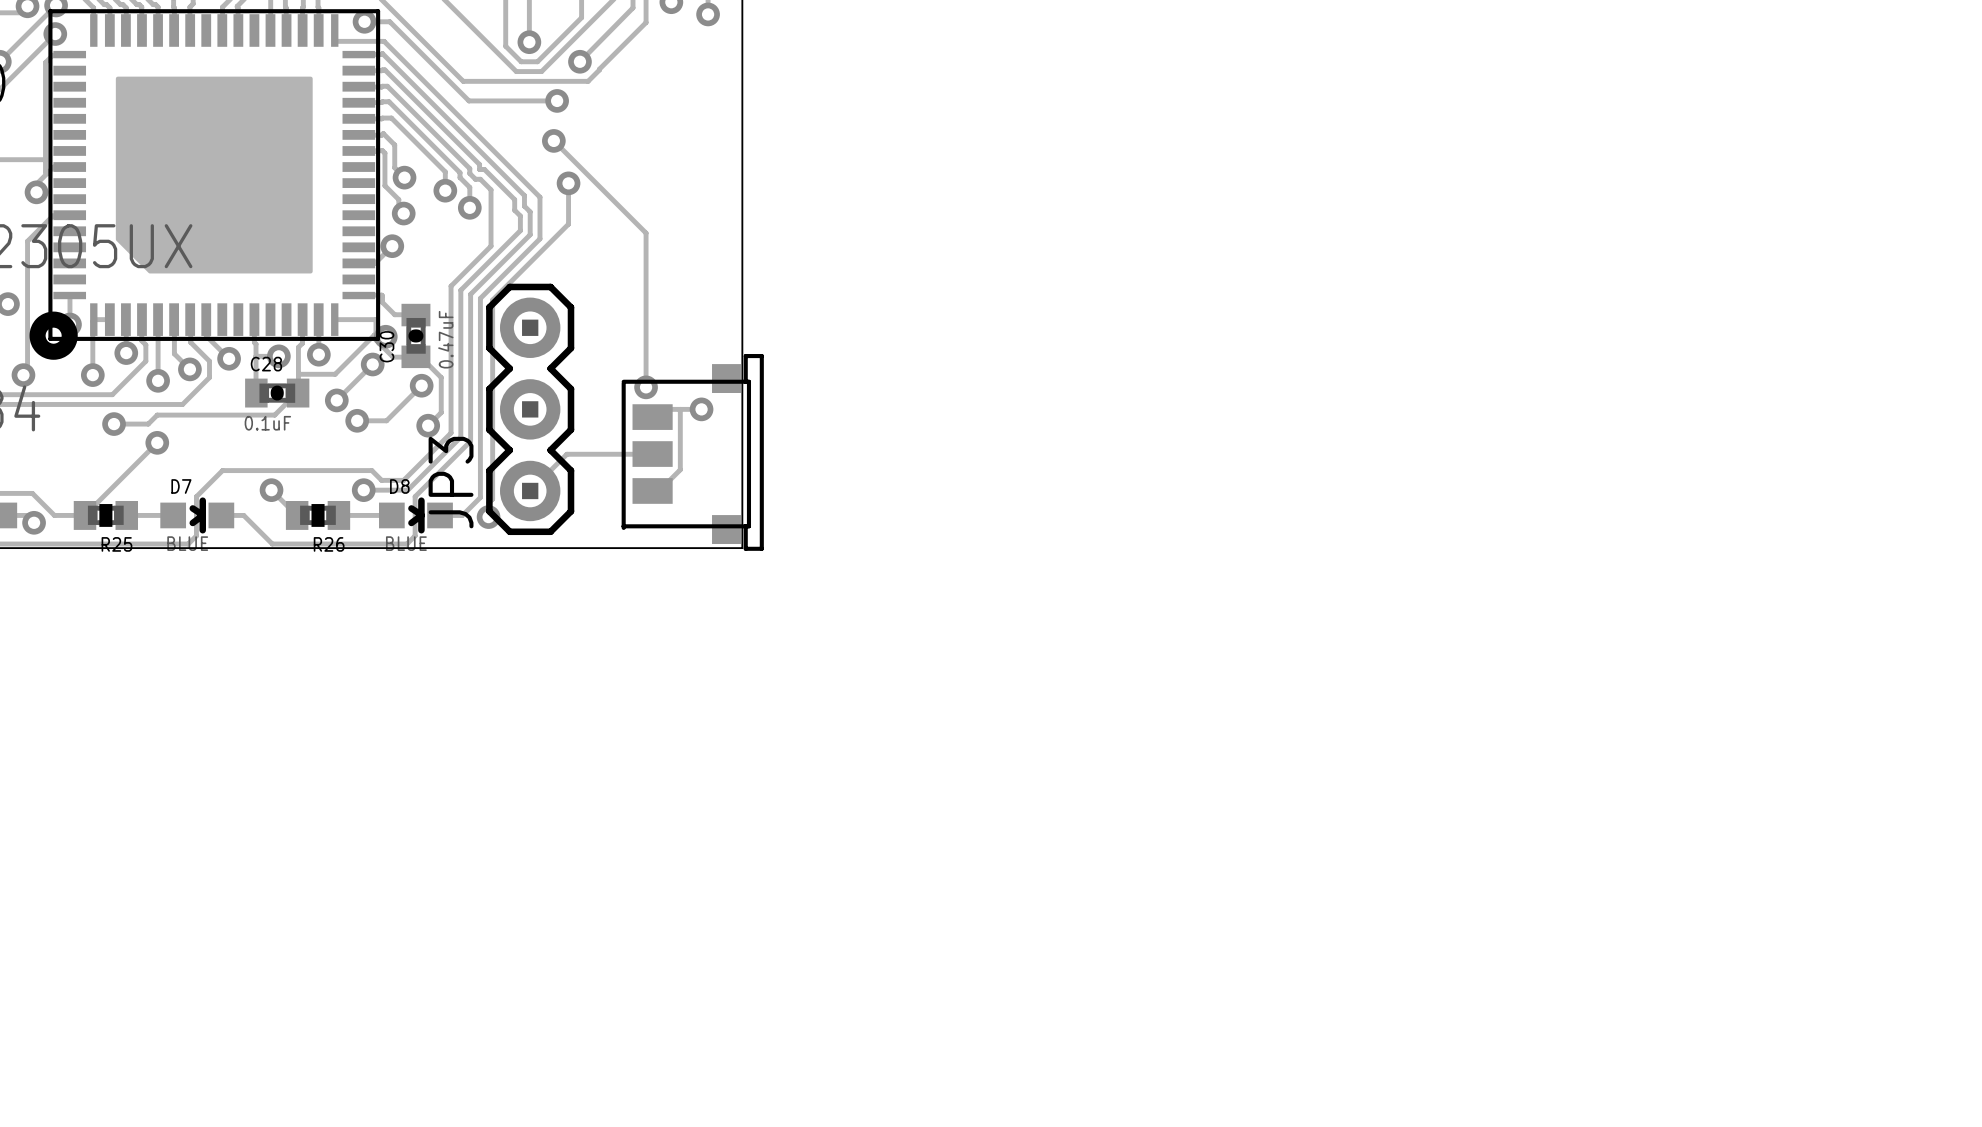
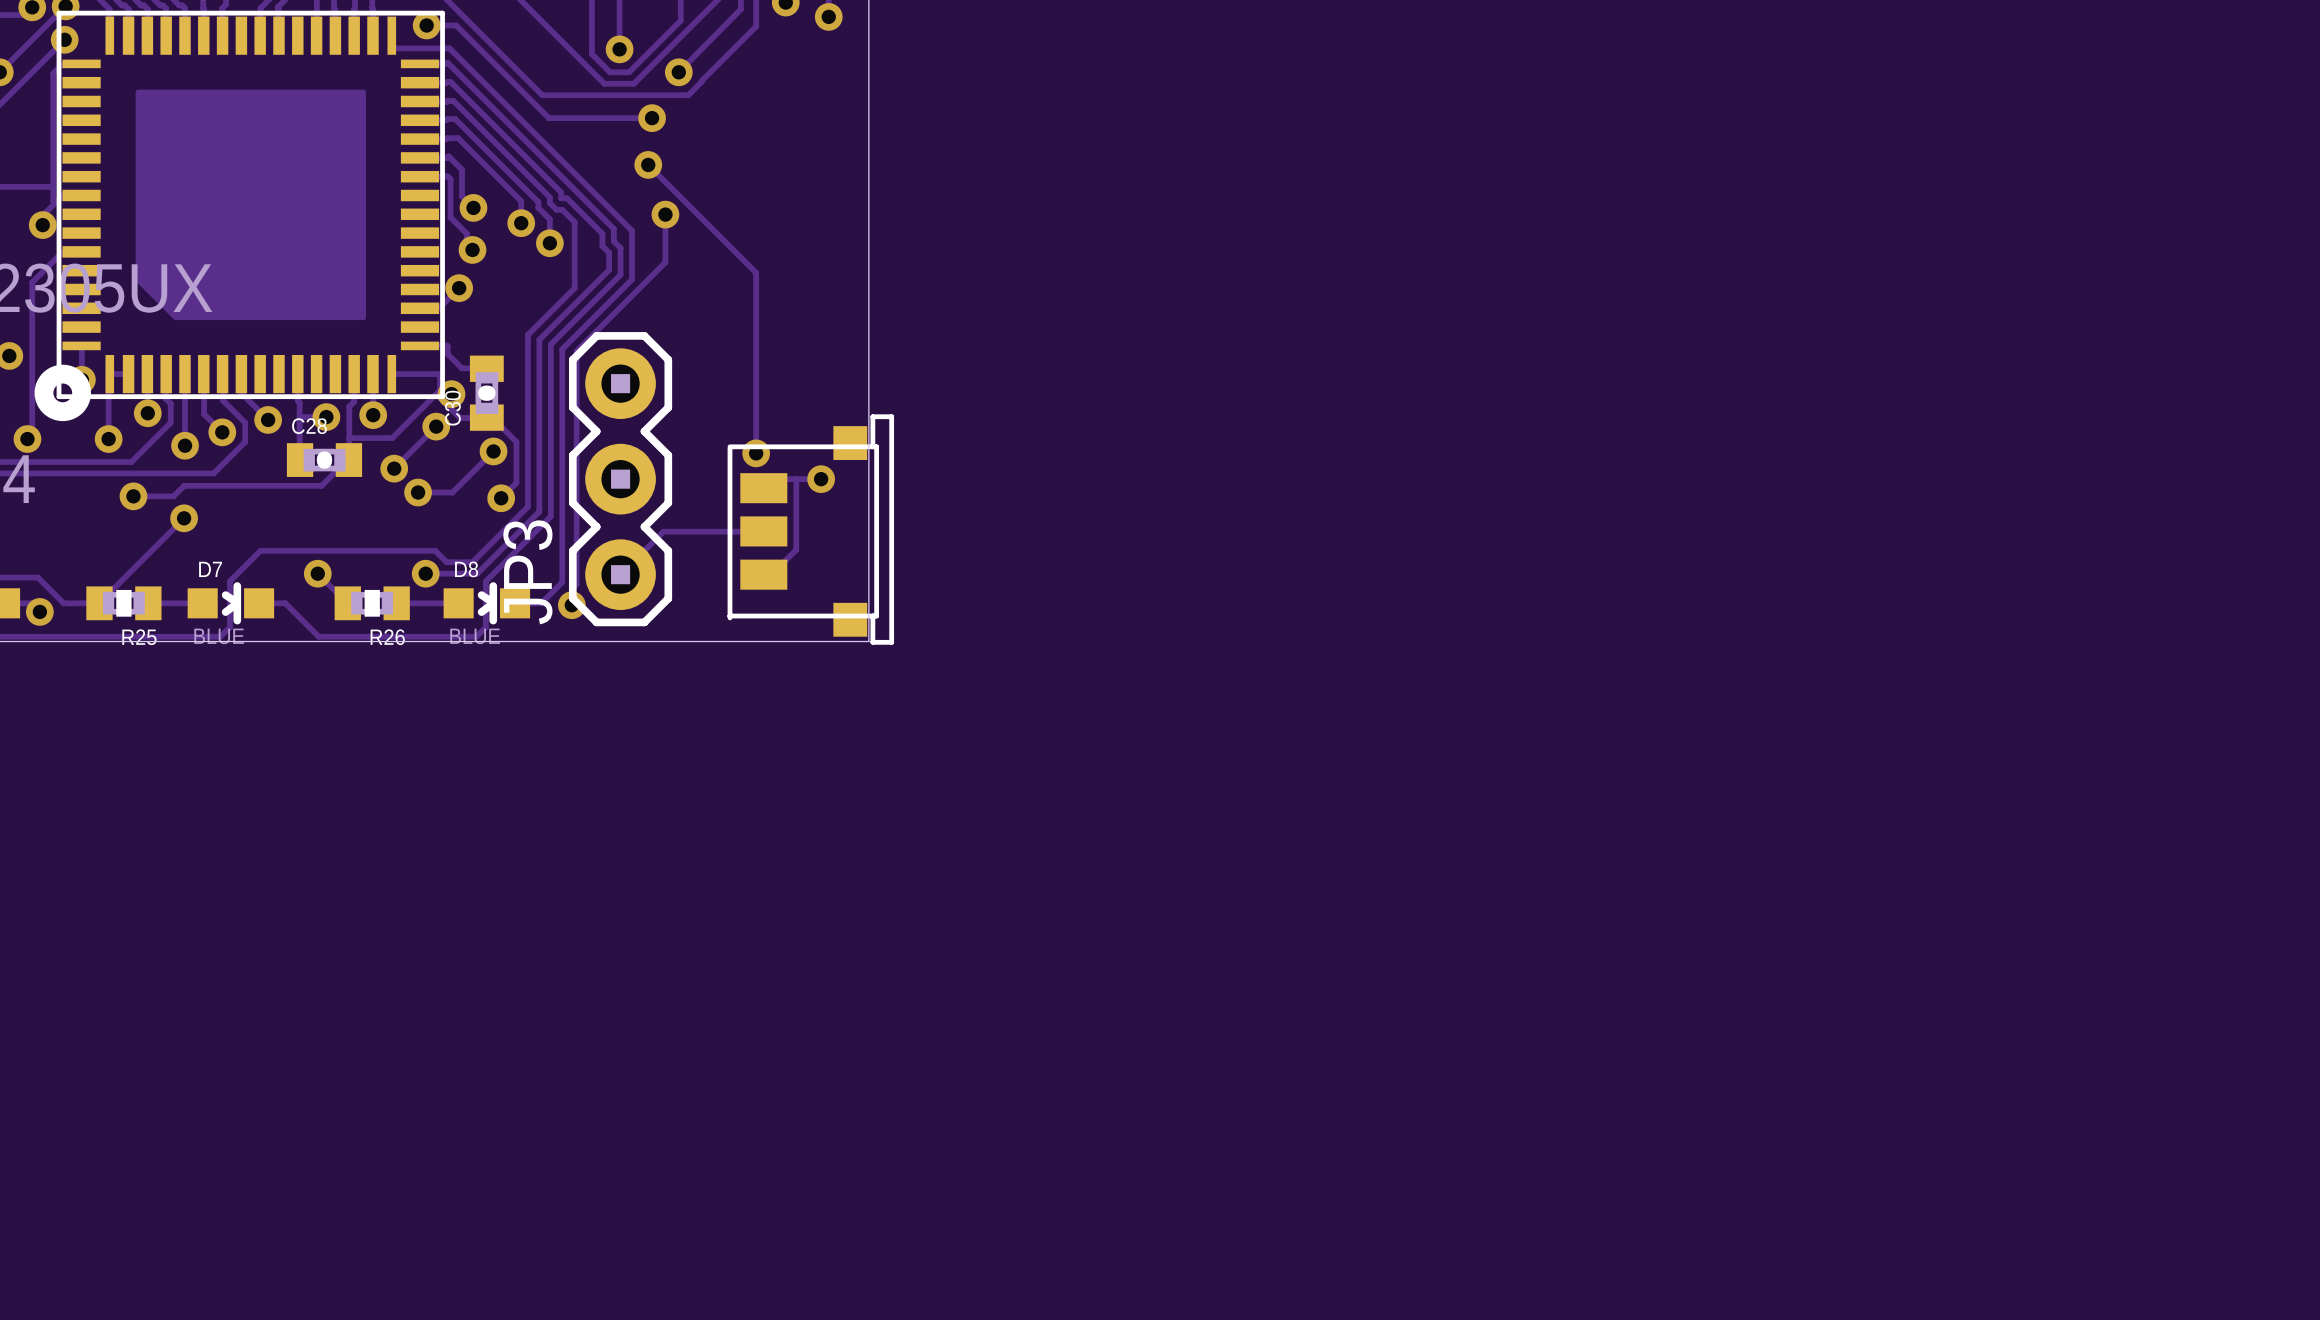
C30 value: 0.47uF (445, 339) -> none
C28 value: 0.1uF (267, 423) -> none

